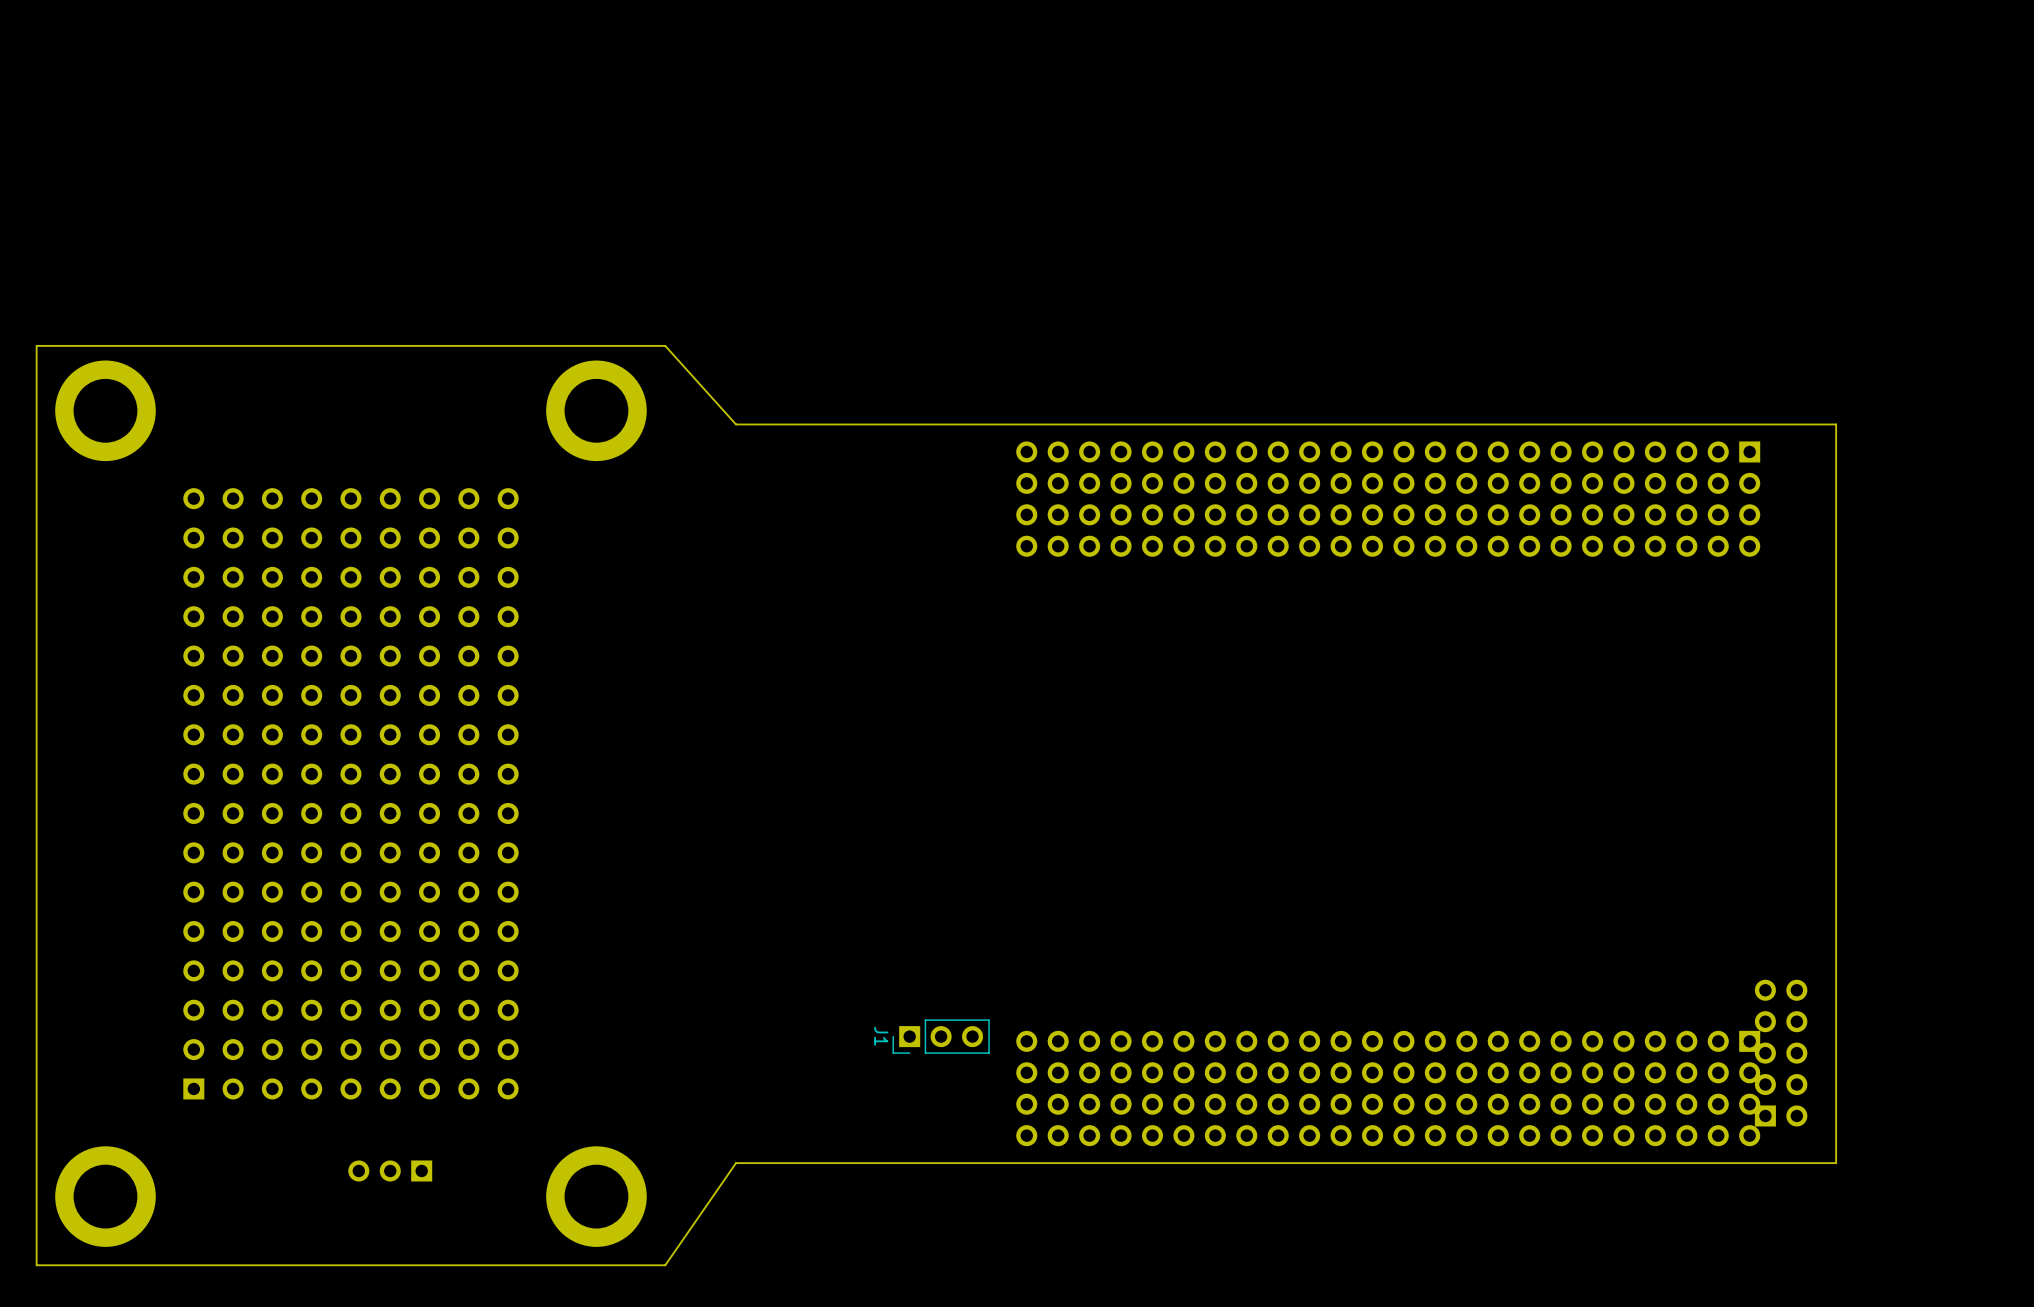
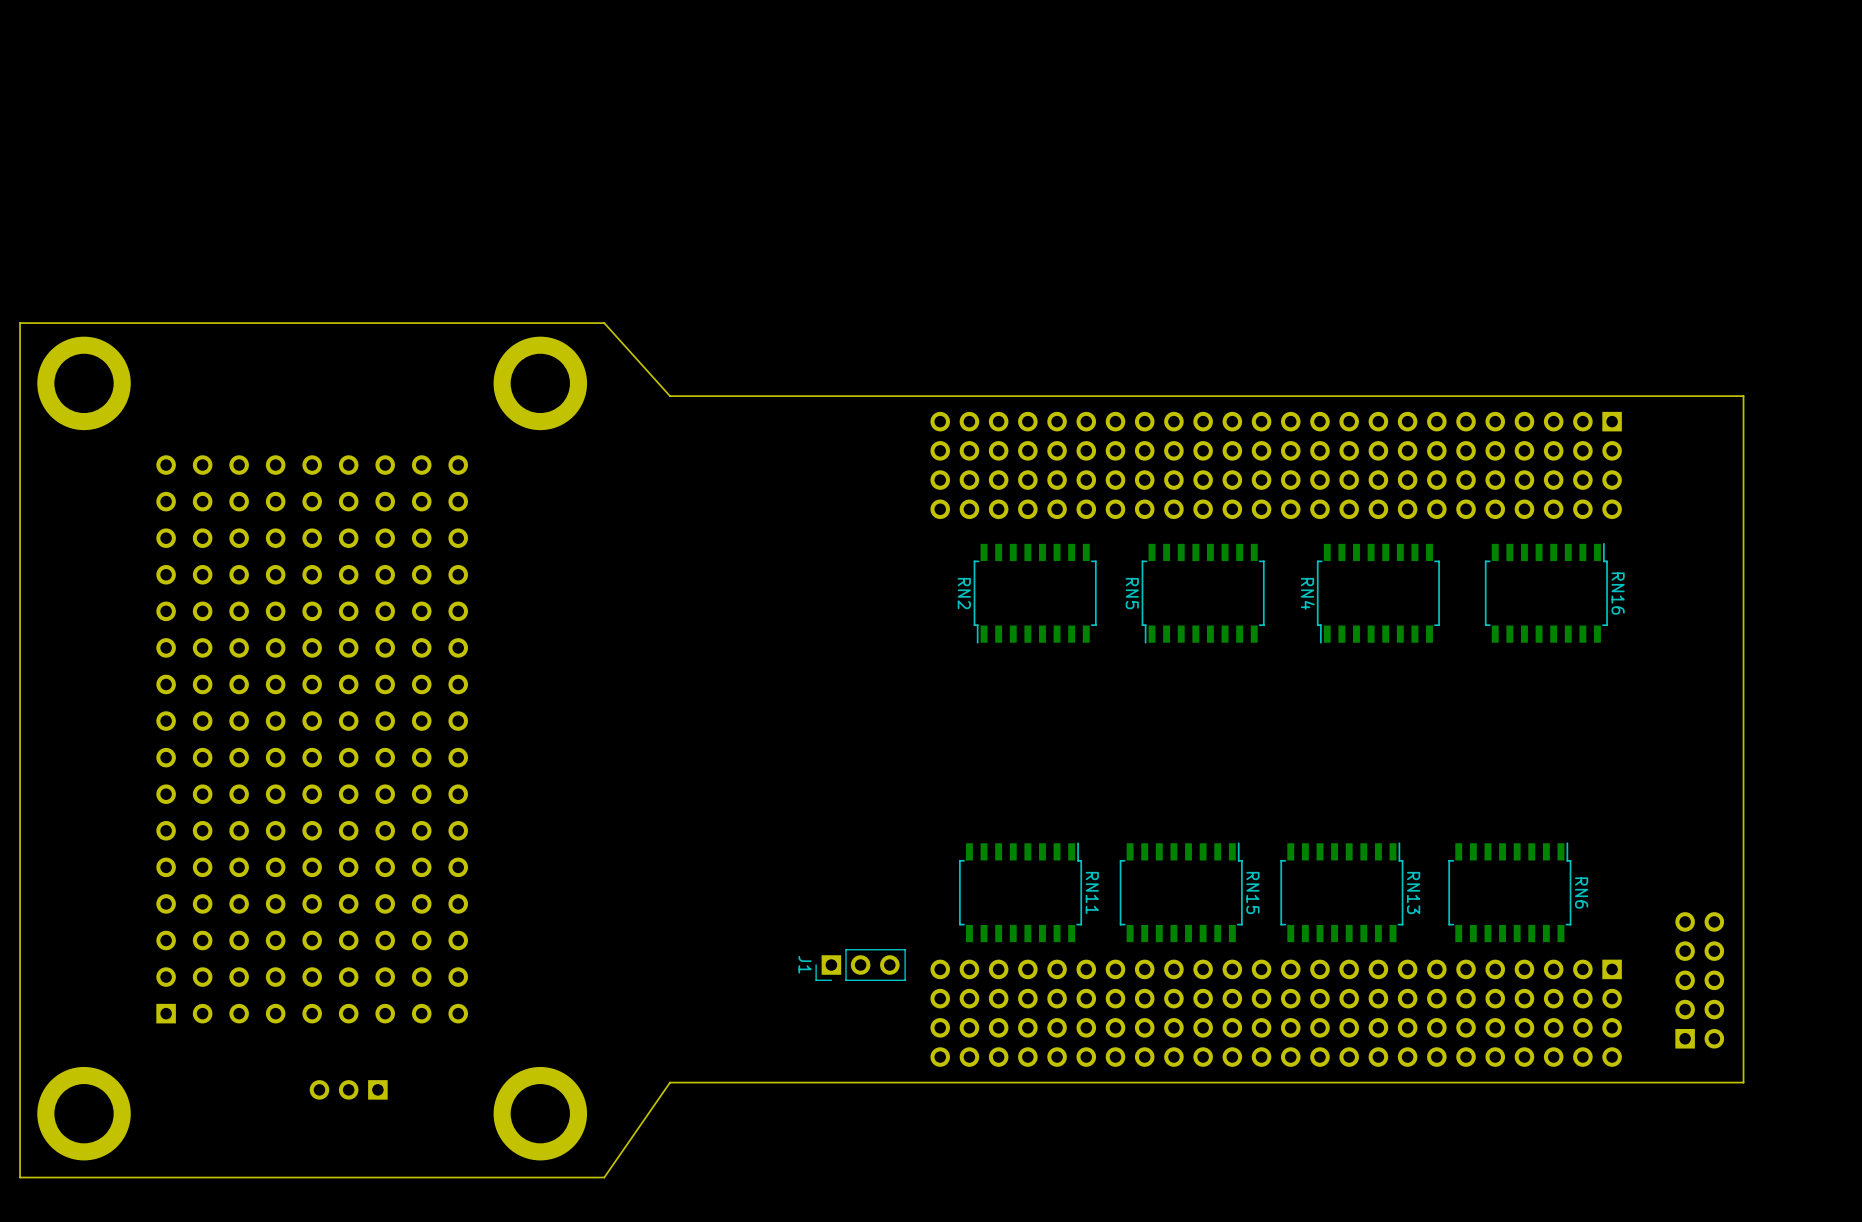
board edge: (1836, 424) (1836, 1163) -> (1692, 396) (1743, 396) (1743, 1082) (1692, 1082)
RN16: none -> (1546, 592)
RN2: none -> (1035, 593)
RN5: none -> (1203, 593)
RN4: none -> (1378, 593)
RN11: none -> (1020, 892)
RN15: none -> (1181, 892)
RN13: none -> (1341, 892)
RN6: none -> (1509, 892)
part position: (1781, 1053) -> (1699, 980)

